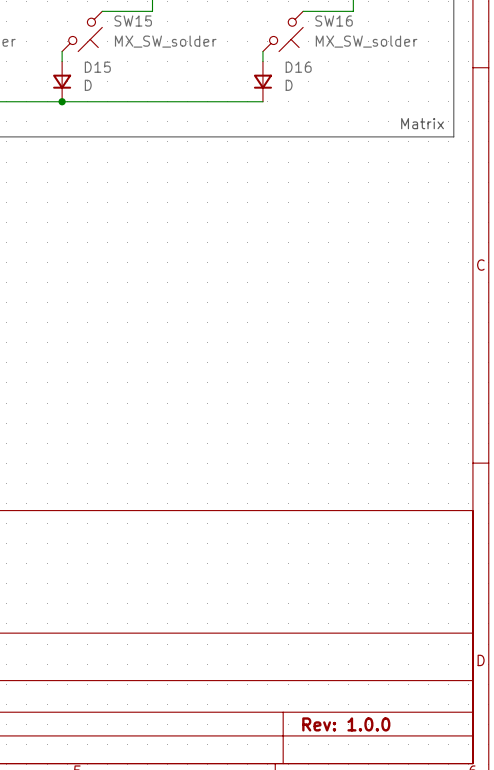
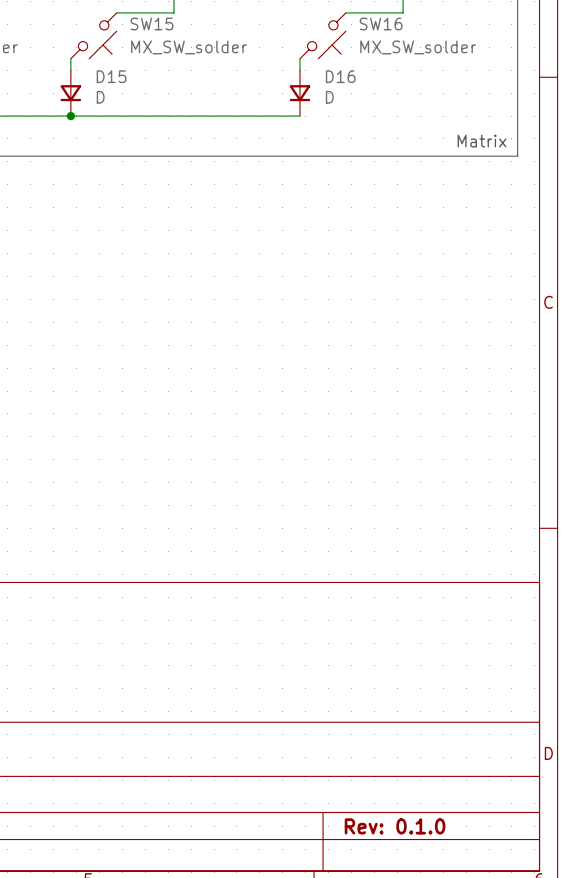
title block: Rev: 1.0.0 (346, 724) -> Rev: 0.1.0 (395, 826)

